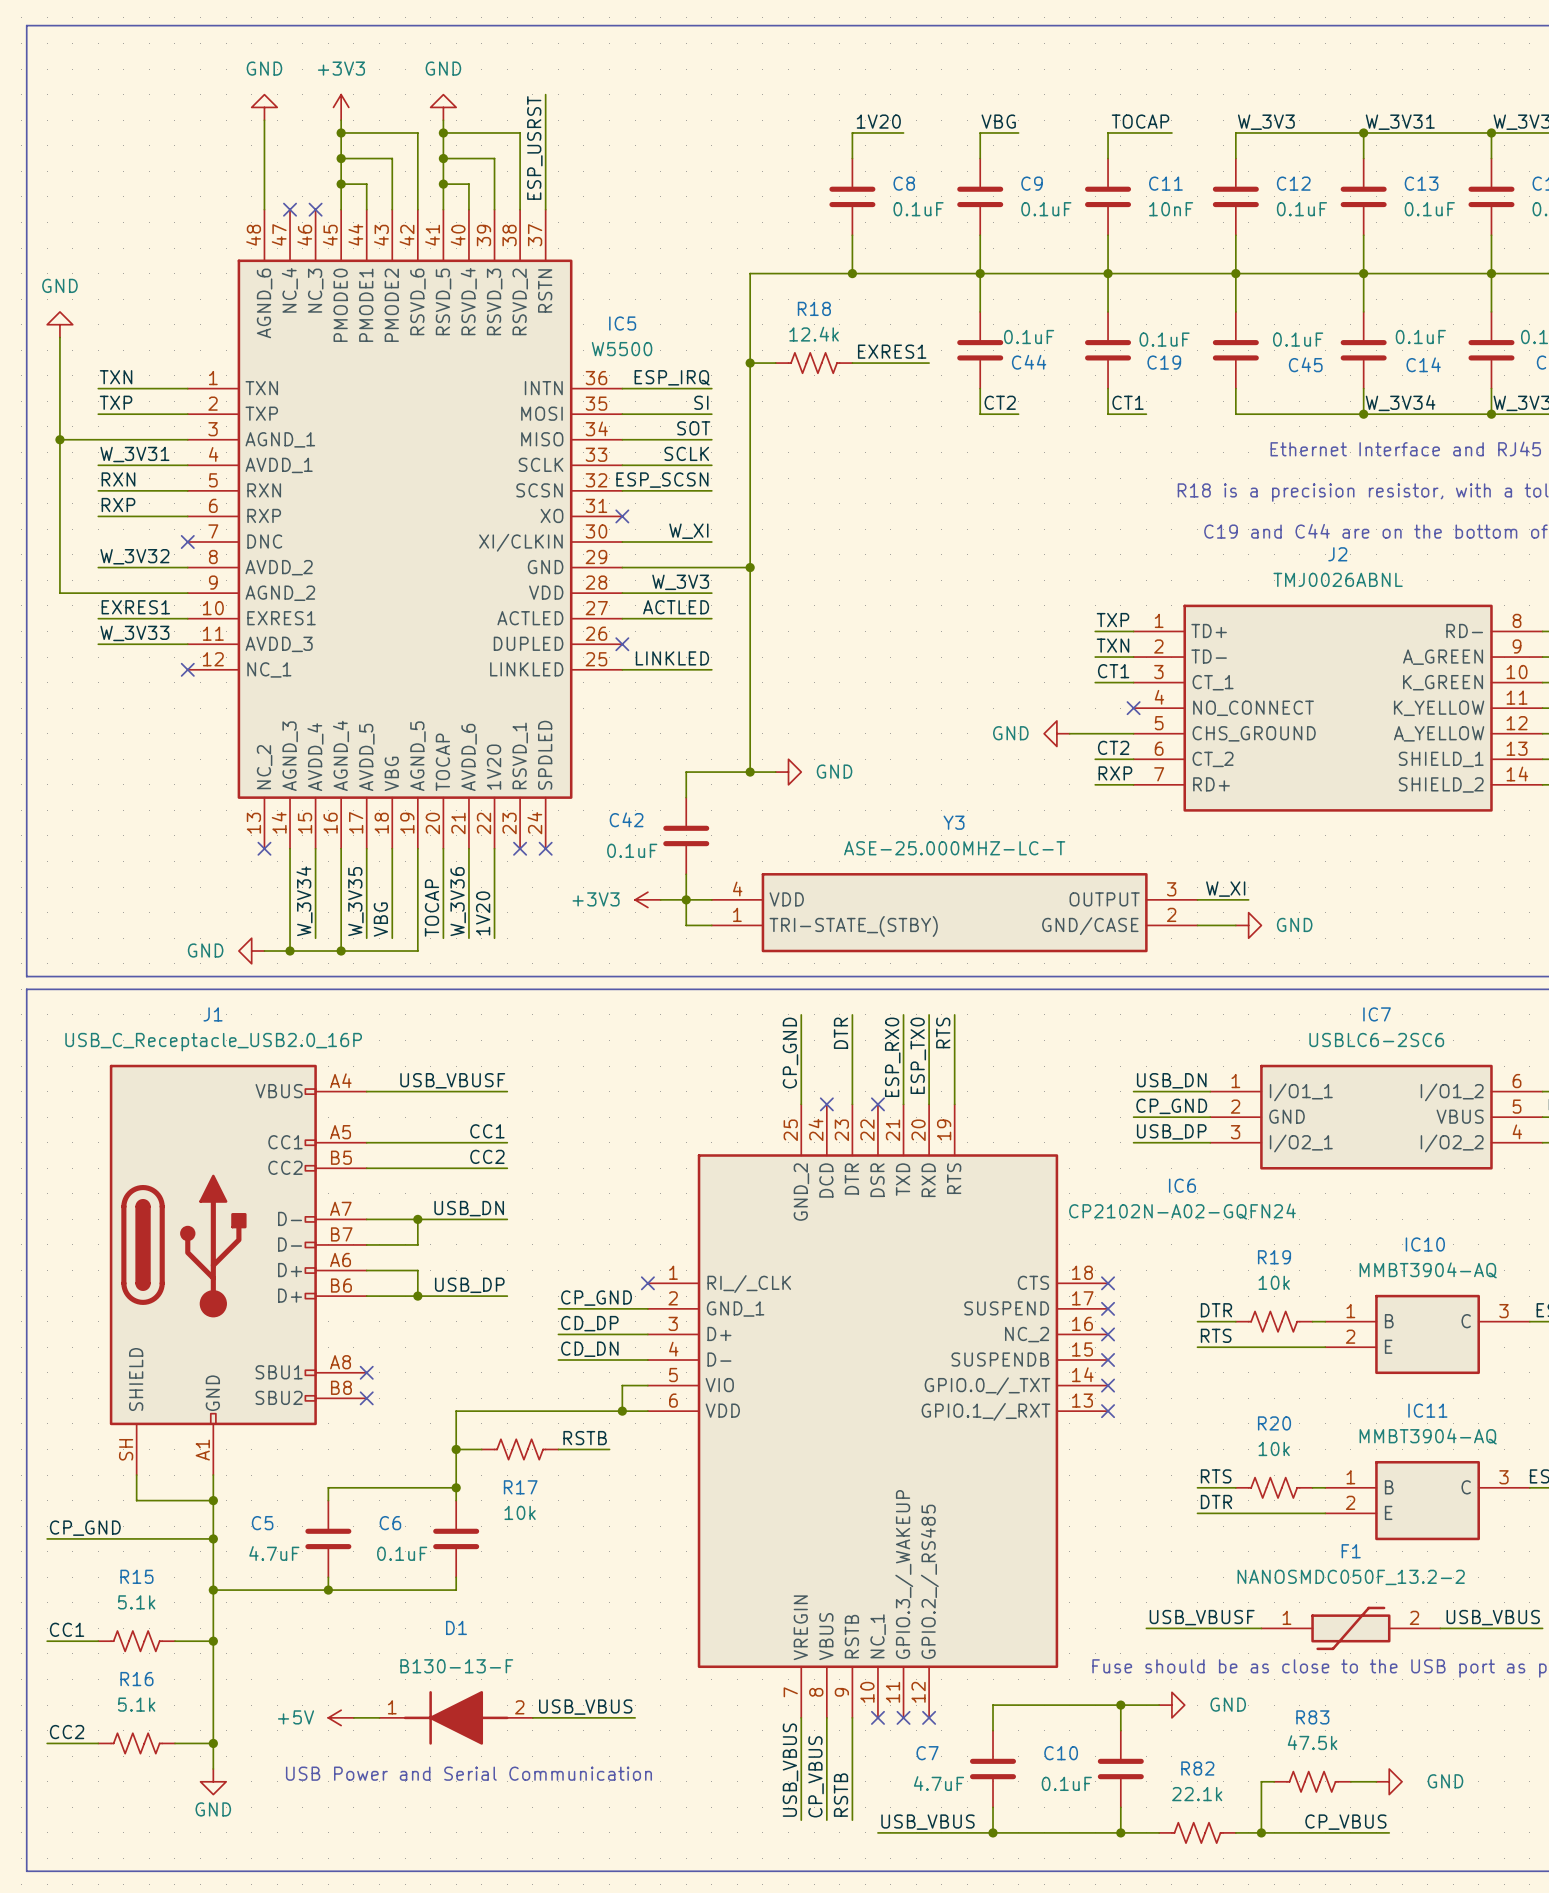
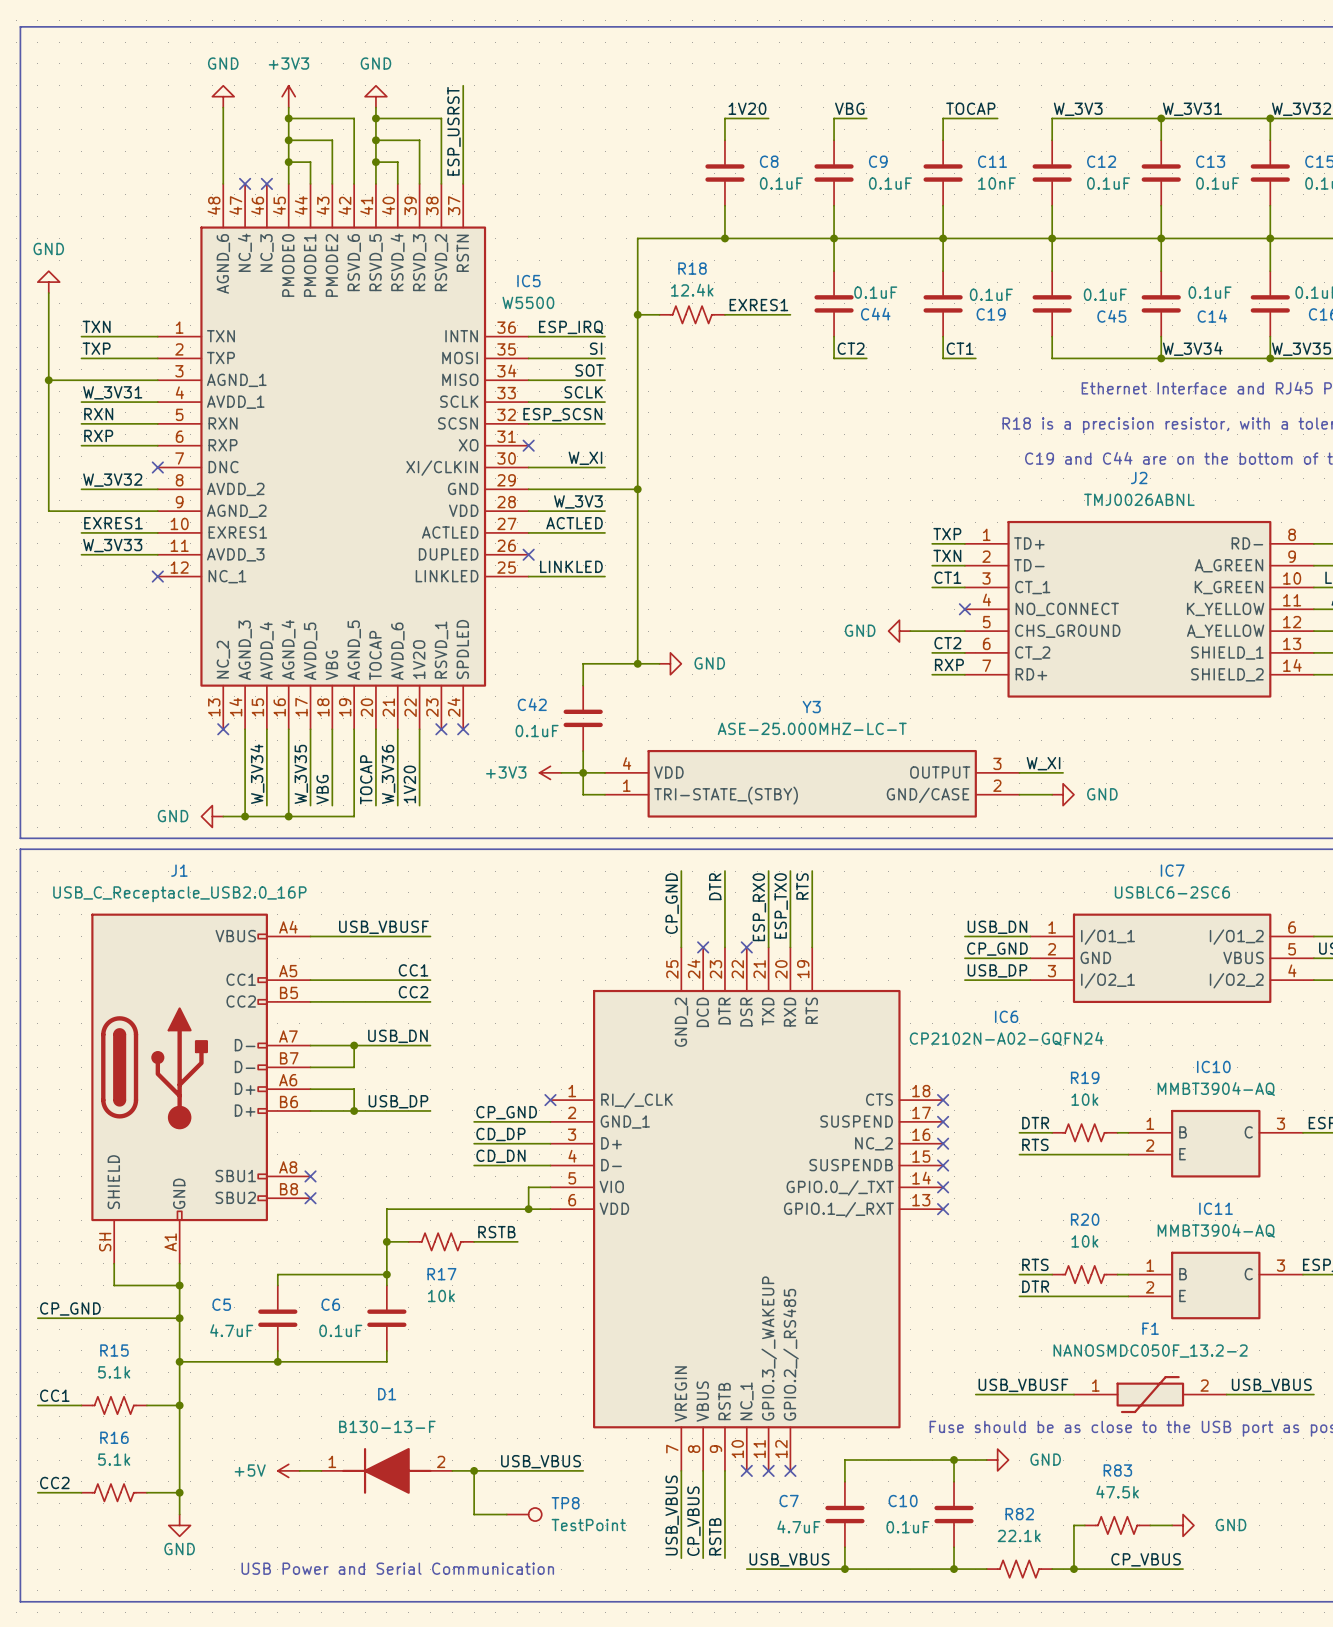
label position: USB_VBUS (585, 1707) -> USB_VBUS (541, 1461)
wire: none -> (474, 1470) (474, 1514) (506, 1514)
junction: none -> (474, 1470)
wire: none -> (539, 1470) (583, 1470)
TP8: none -> TestPoint (524, 1514)
text position: USB Power and Serial Communication (468, 1773) -> USB Power and Serial Communication (397, 1568)

